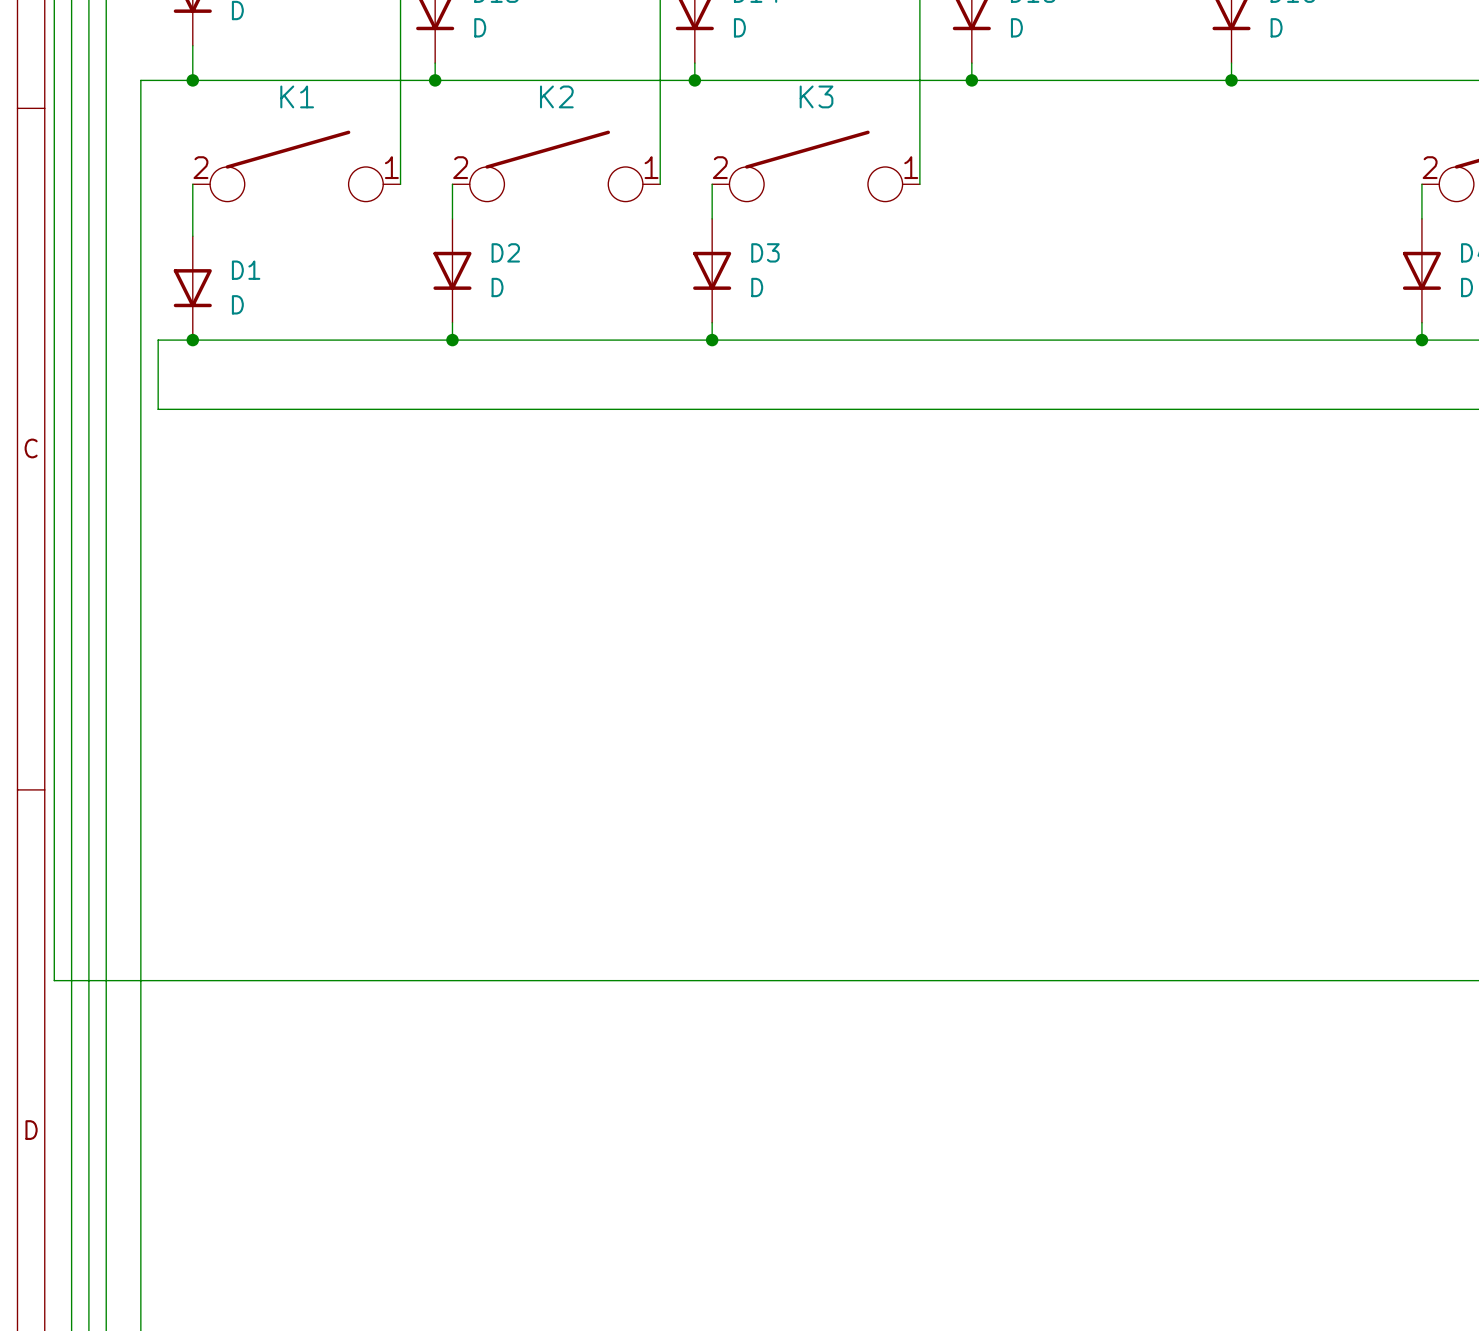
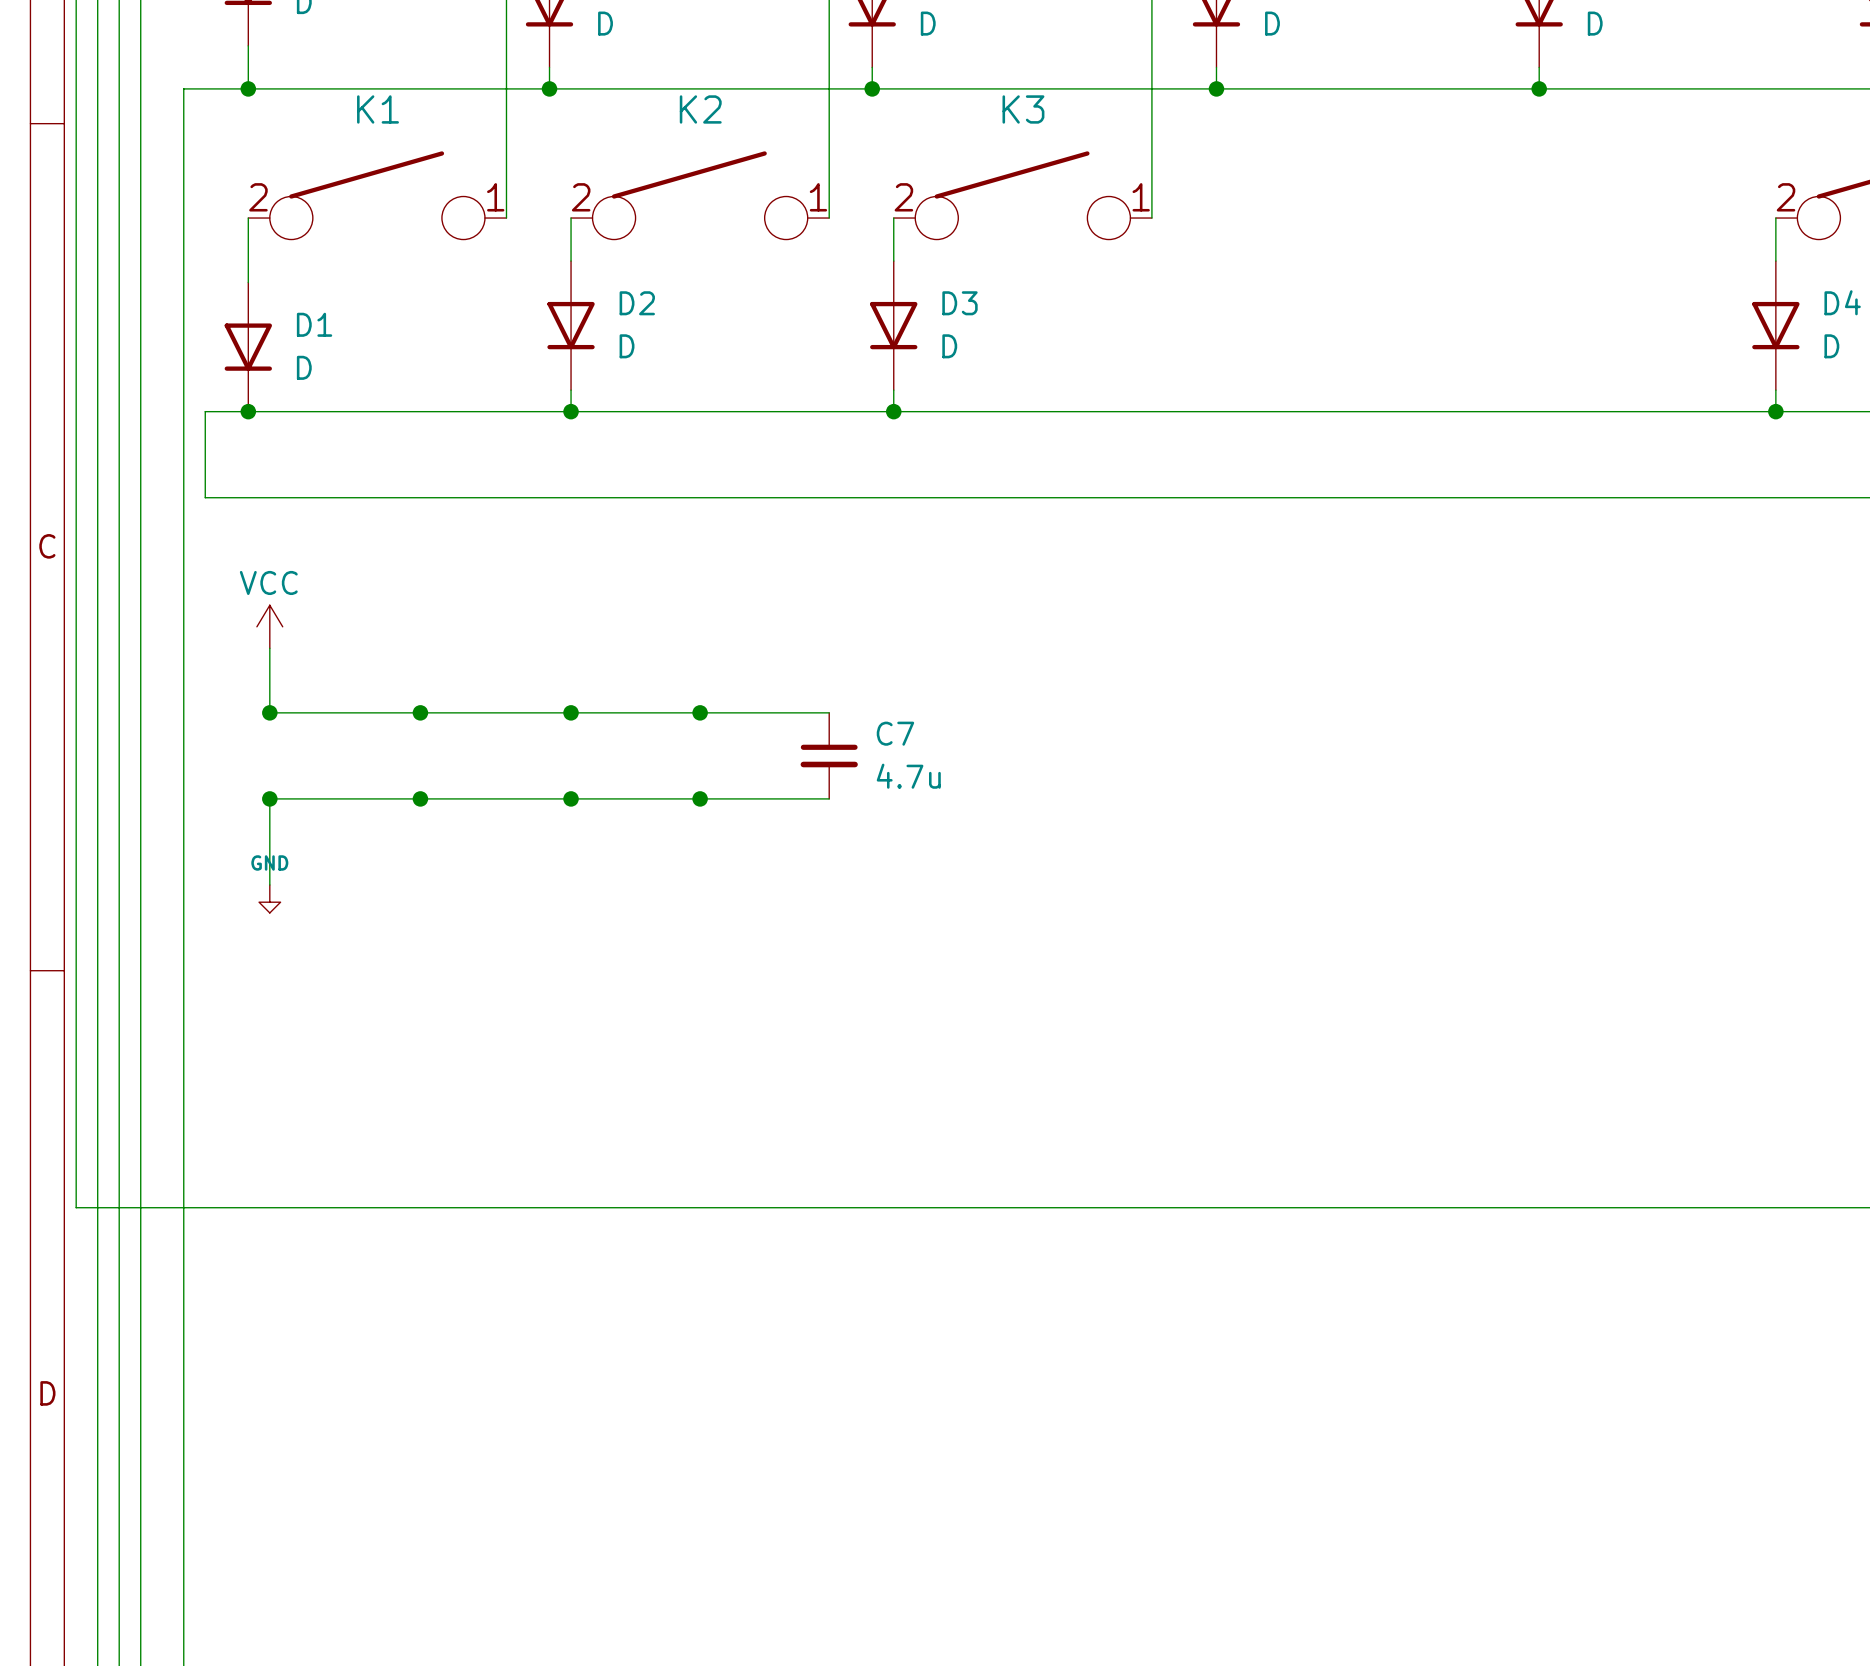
power symbol: none -> VCC (269, 626)
wire: none -> (269, 648) (269, 712) (829, 712)
junction: none -> (269, 712)
junction: none -> (420, 712)
junction: none -> (571, 712)
junction: none -> (700, 712)
C7: none -> 4.7u (829, 755)
junction: none -> (269, 798)
junction: none -> (420, 798)
junction: none -> (571, 798)
junction: none -> (700, 798)
wire: none -> (829, 798) (269, 798) (269, 884)
power symbol: none -> GND (269, 898)

